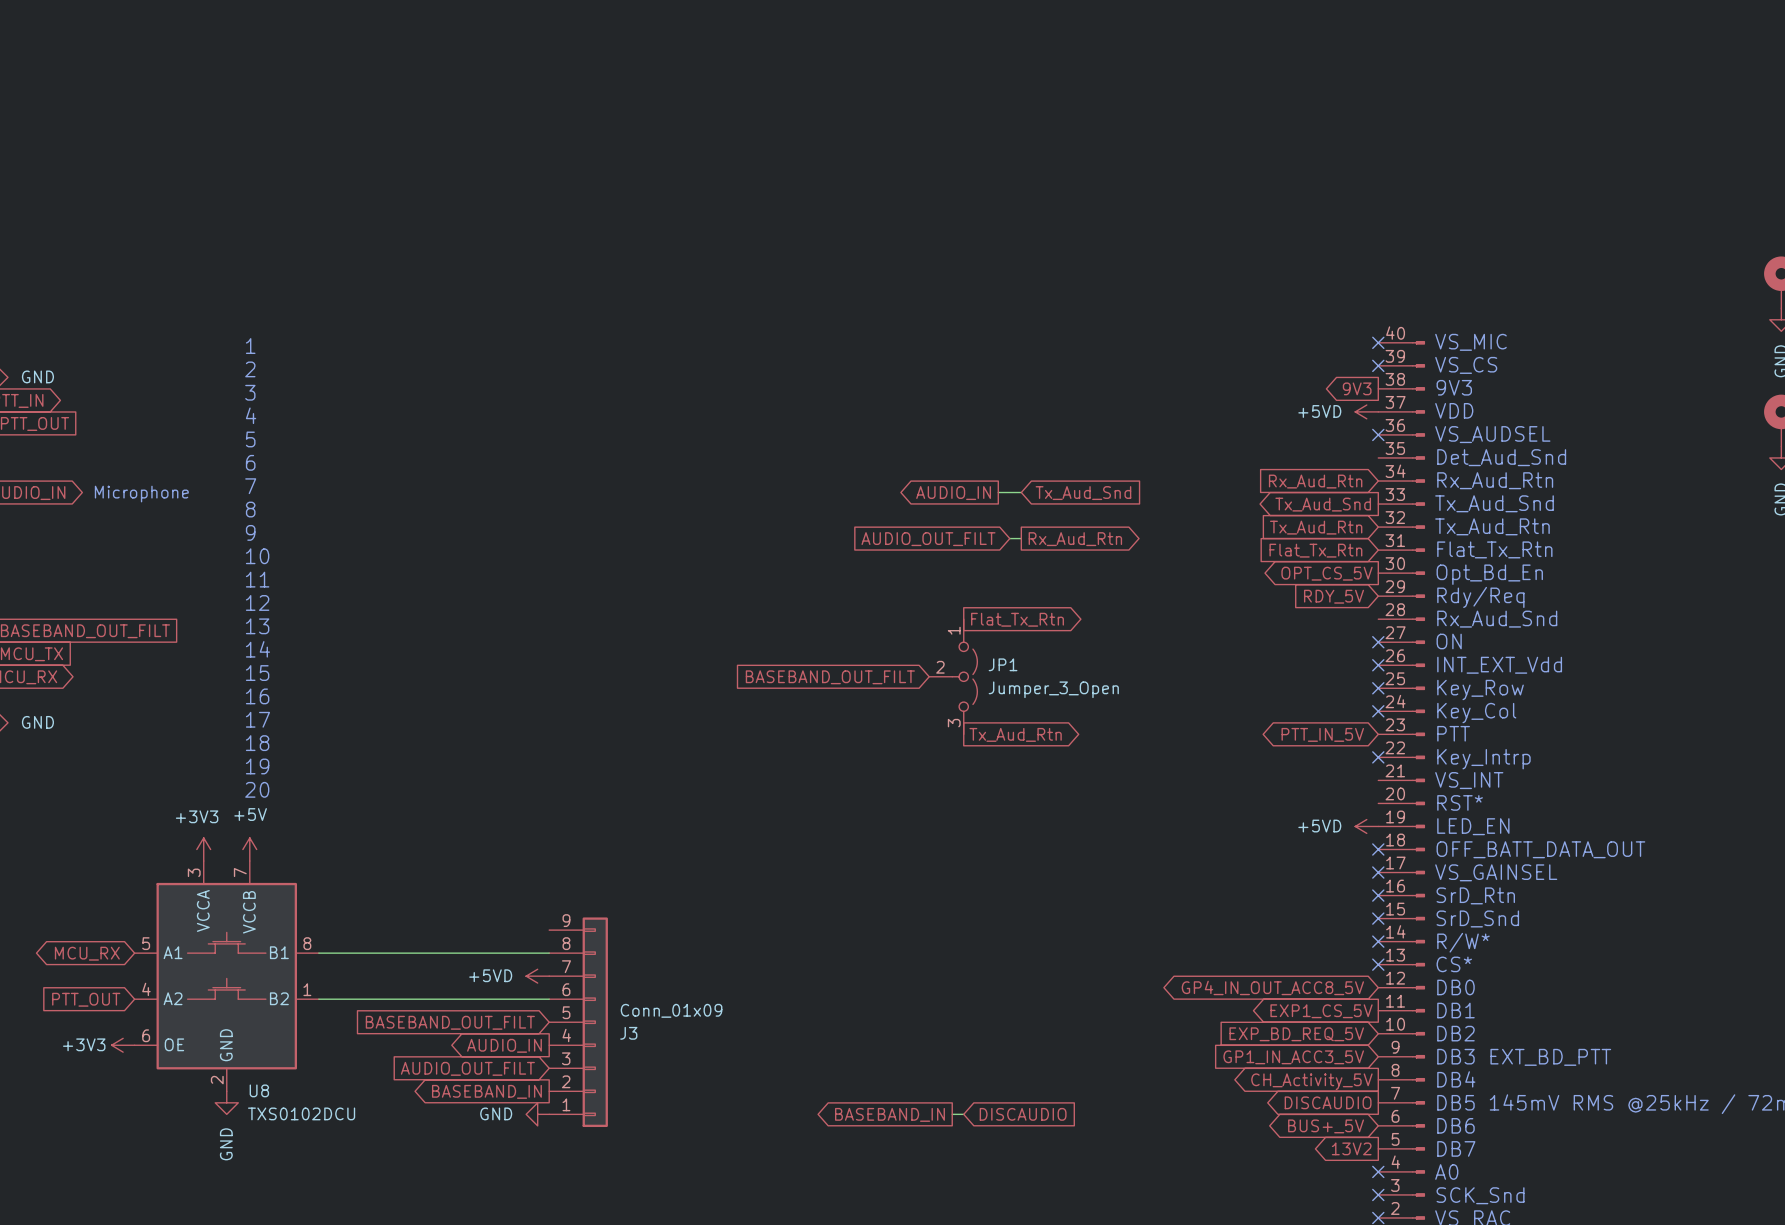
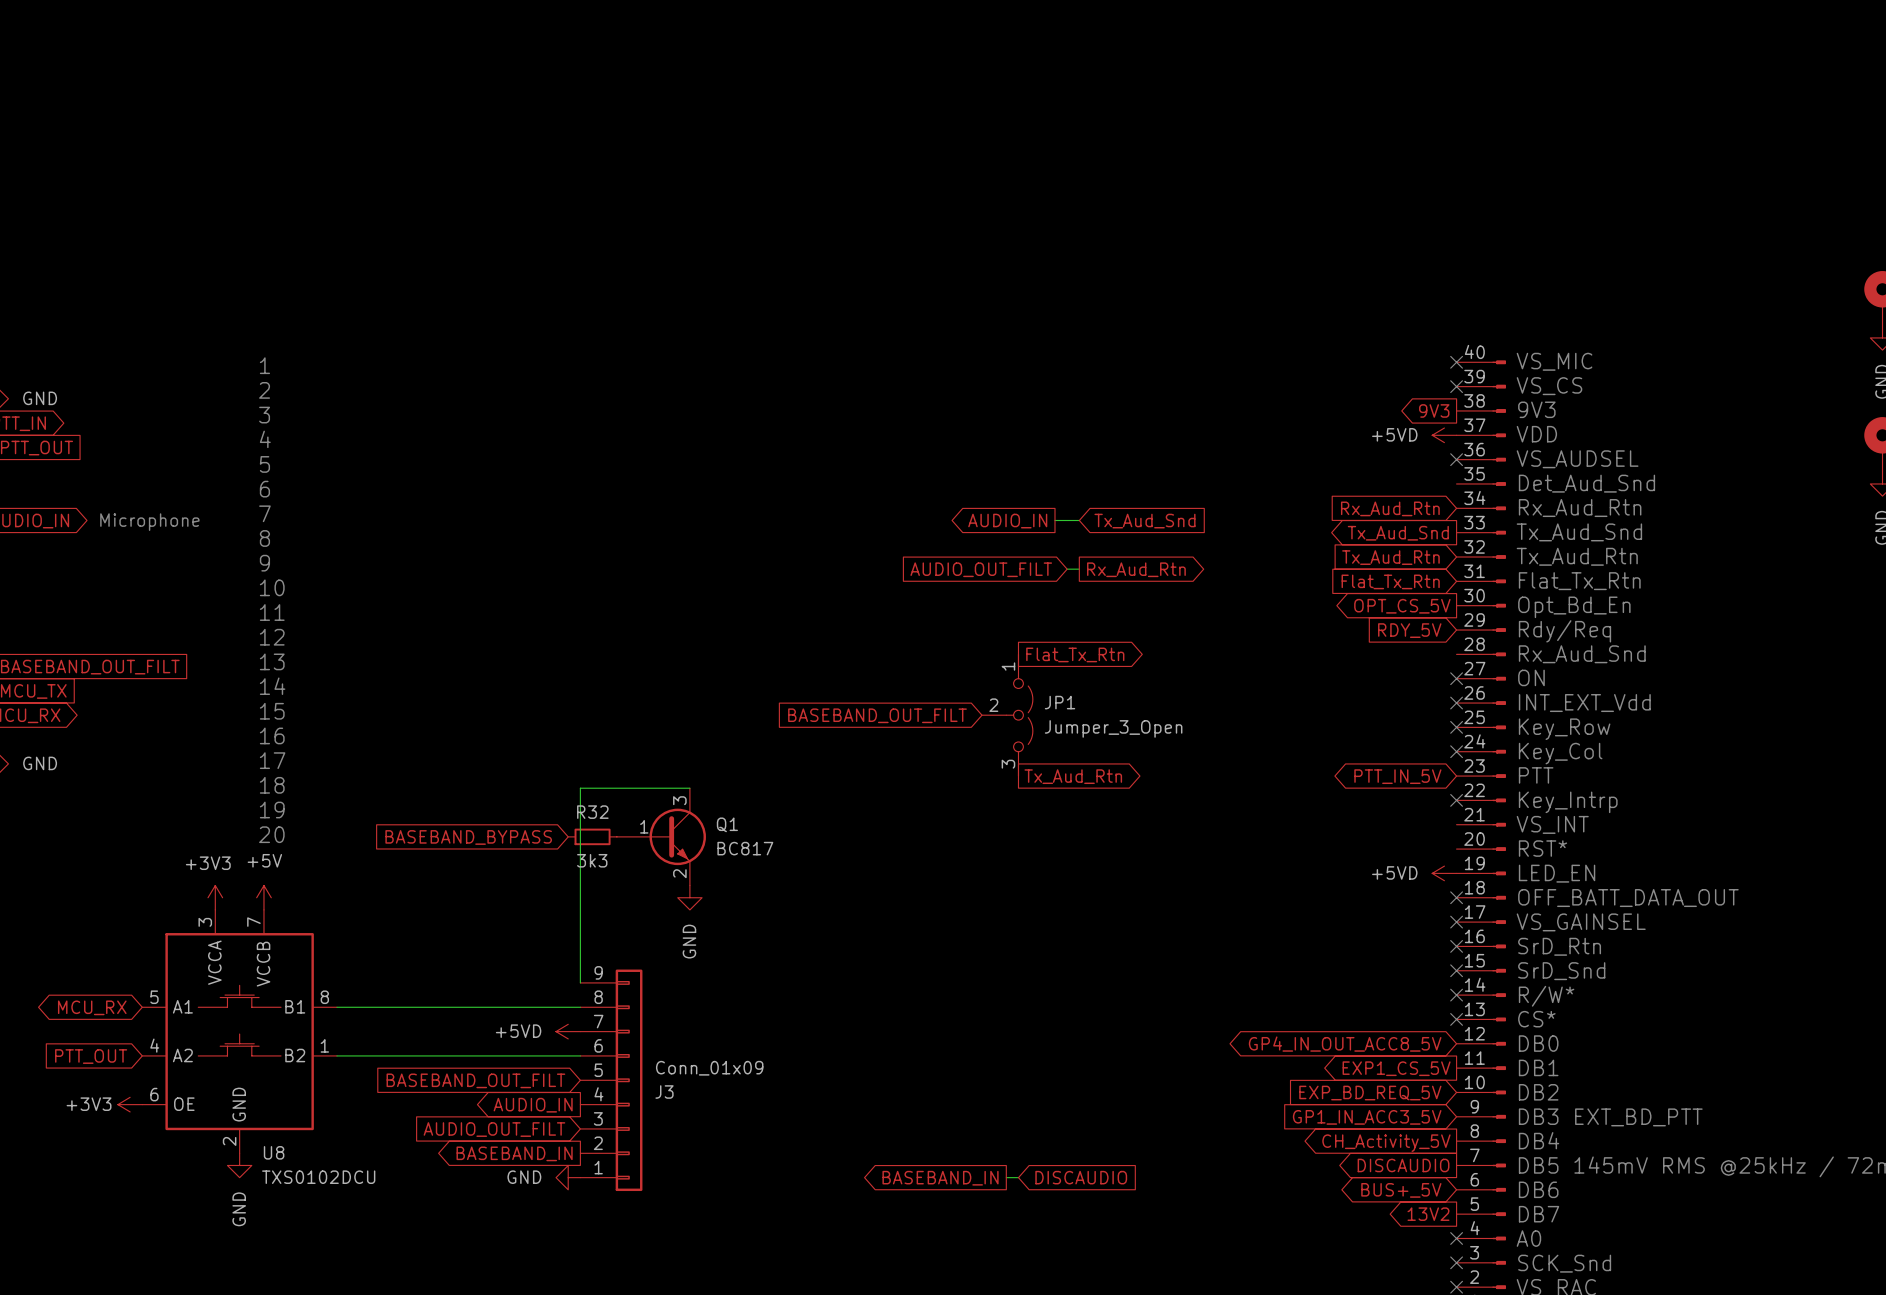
wire: none -> (689, 788) (580, 788) (580, 982)
R32: none -> 3k3 (592, 836)
Q1: none -> BC817 (661, 836)
global label: none -> BASEBAND_BYPASS (468, 837)
power symbol: none -> GND (689, 897)

